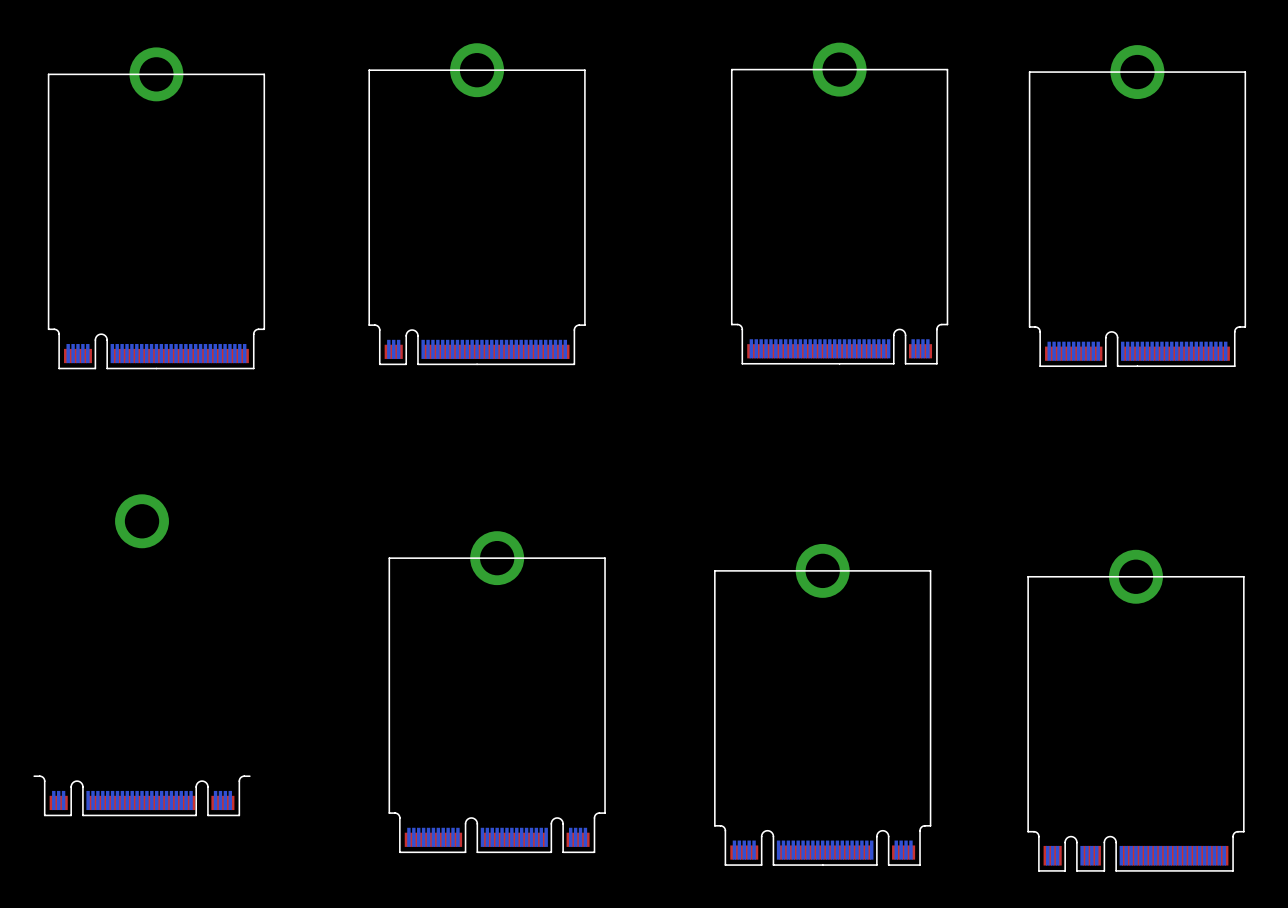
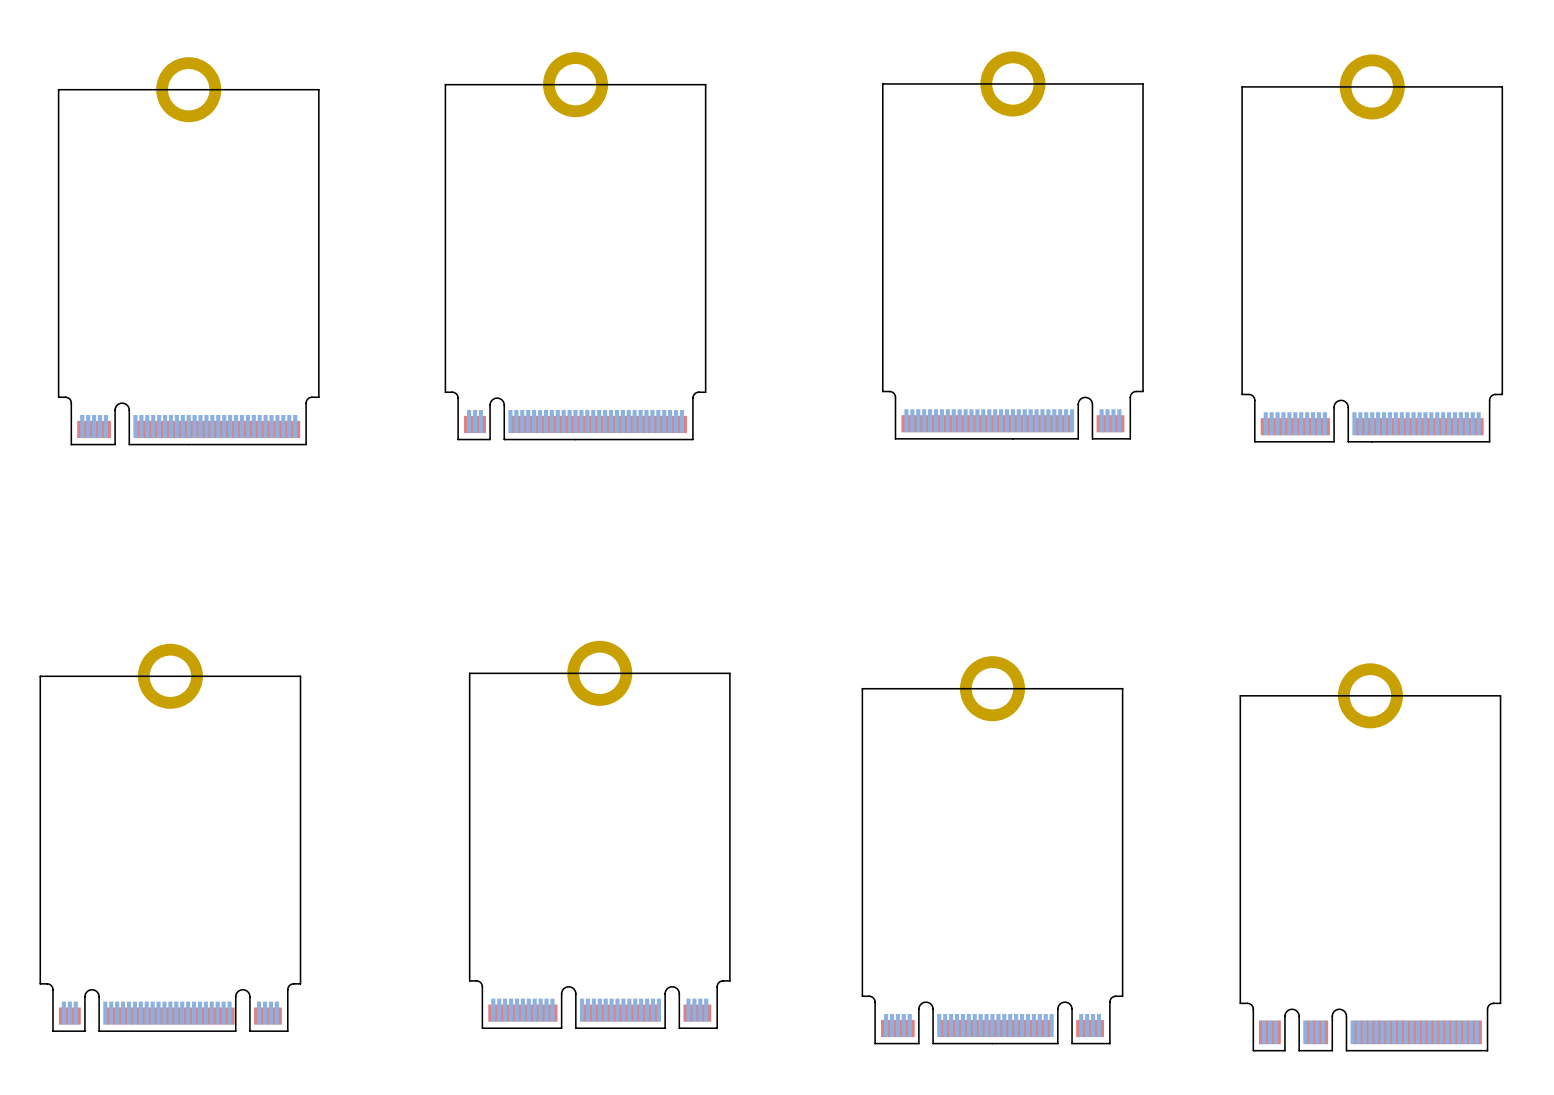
part position: (142, 521) -> (170, 676)
part position: (142, 795) -> (170, 1007)
board edge: none -> (300, 983) (300, 676) (40, 676) (40, 983)

